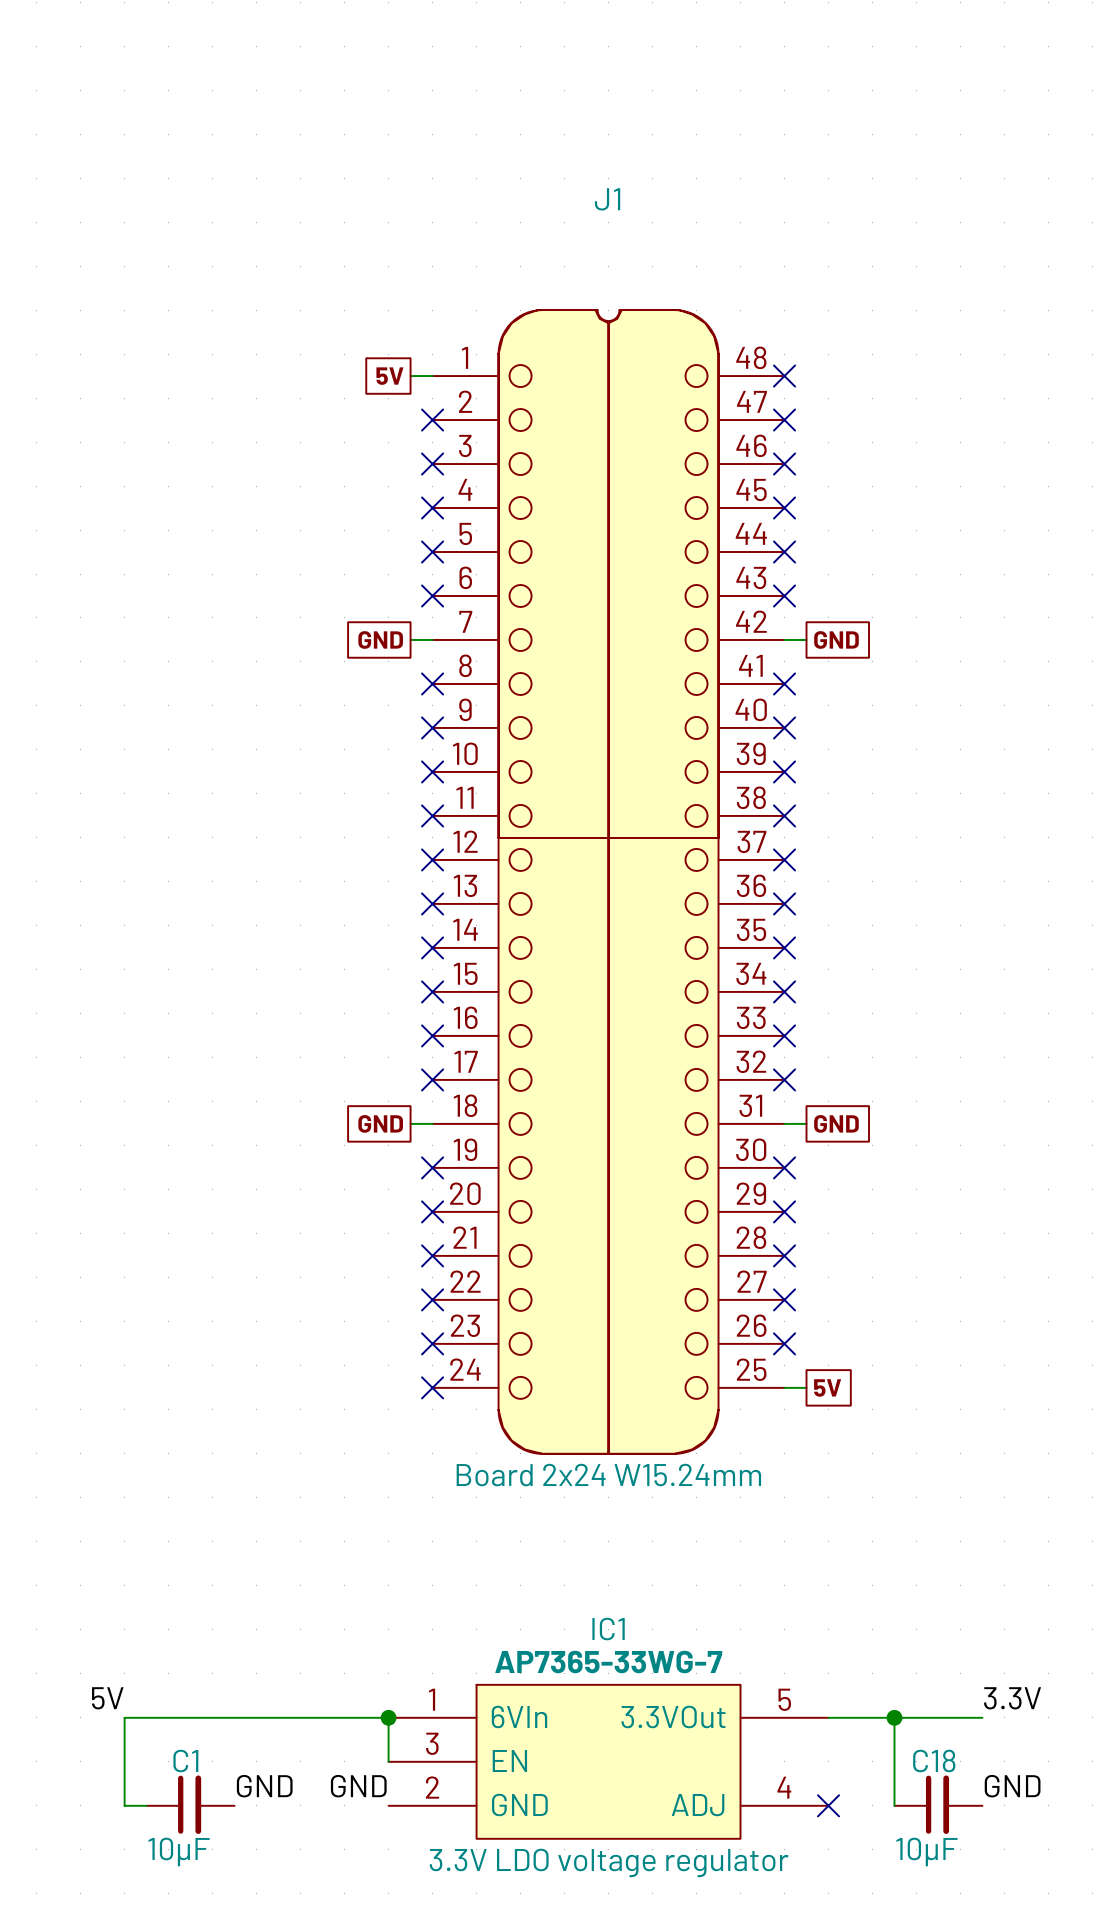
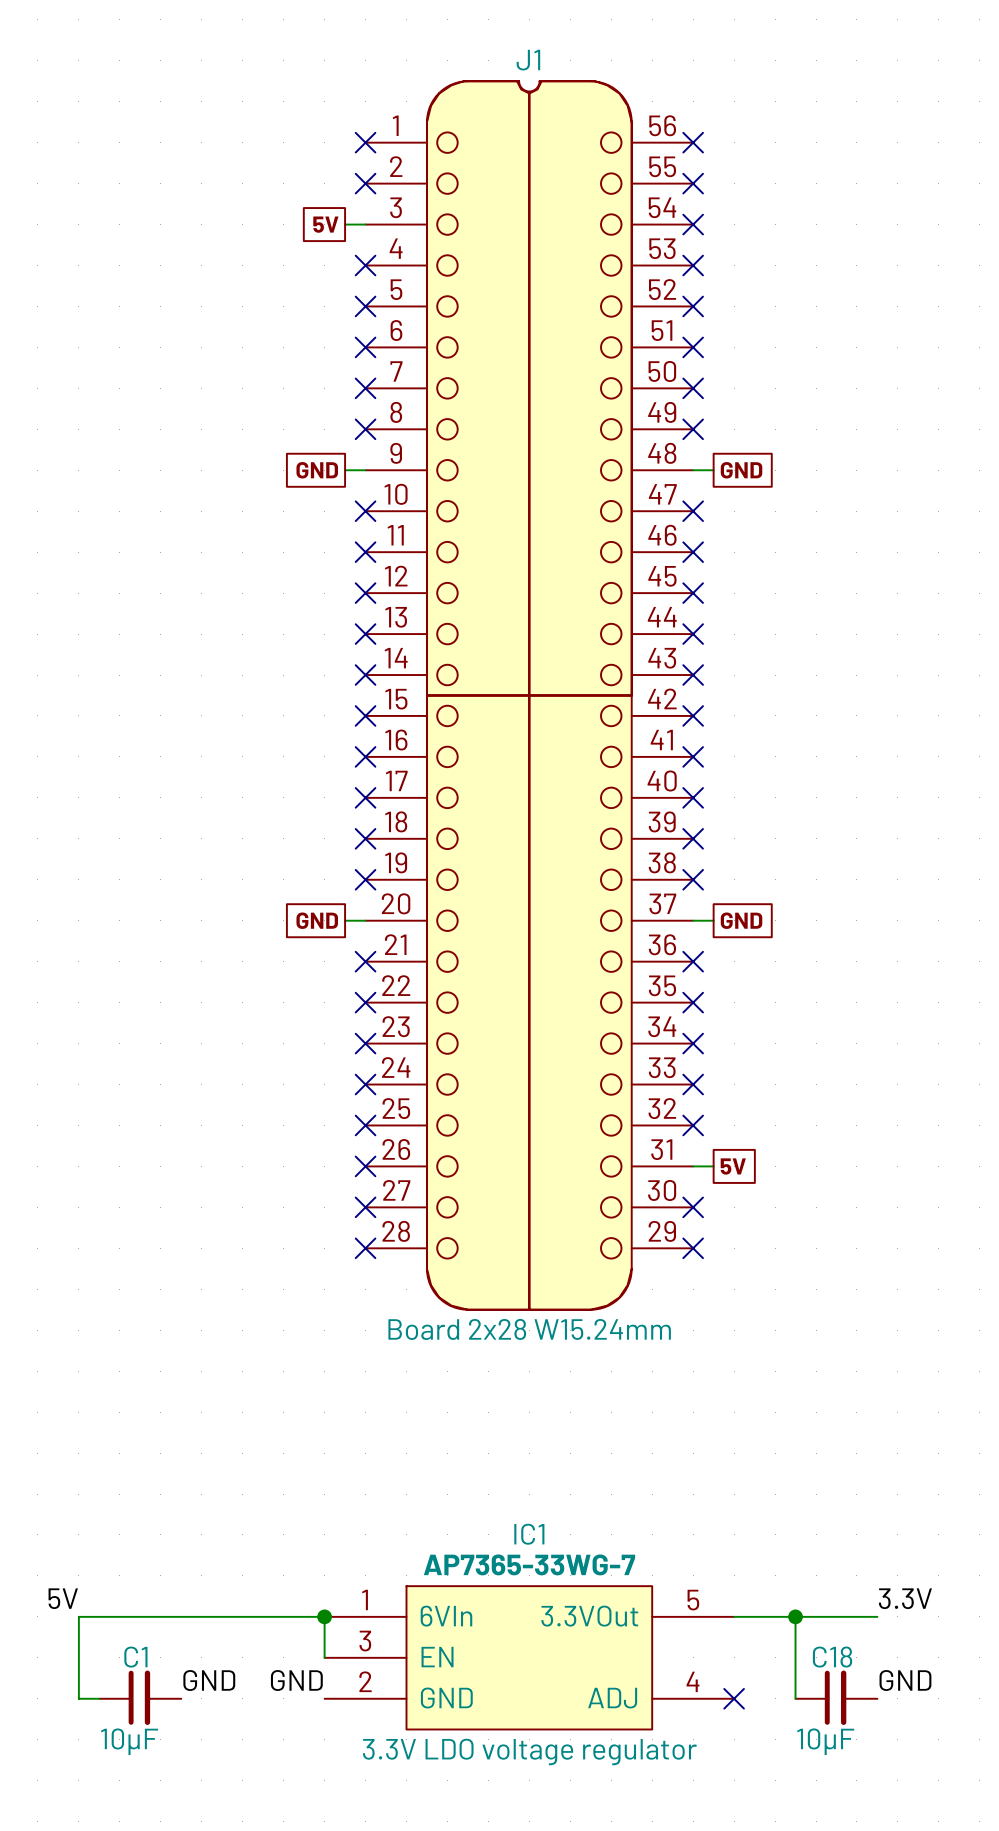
no-connect mark: none -> (365, 142)
no-connect mark: none -> (693, 142)
no-connect mark: none -> (365, 183)
no-connect mark: none -> (693, 183)
no-connect mark: none -> (693, 224)
no-connect mark: none -> (365, 265)
no-connect mark: none -> (693, 265)
no-connect mark: none -> (365, 306)
J1 symbol: [432, 310, 785, 1454] -> [365, 81, 694, 1310]
no-connect mark: none -> (693, 306)
no-connect mark: none -> (365, 347)
no-connect mark: none -> (693, 347)
global label position: 5V (389, 376) -> 5V (325, 224)
wire: (410, 376) (432, 376) -> (345, 224) (365, 224)
no-connect mark: (784, 376) -> none
no-connect mark: none -> (365, 388)
no-connect mark: none -> (693, 388)
no-connect mark: (432, 420) -> none
no-connect mark: (784, 420) -> none
no-connect mark: none -> (365, 429)
no-connect mark: none -> (693, 429)
no-connect mark: (432, 464) -> none
no-connect mark: (784, 464) -> none
no-connect mark: (432, 508) -> none
no-connect mark: (784, 508) -> none
no-connect mark: none -> (365, 511)
no-connect mark: none -> (693, 511)
no-connect mark: (432, 552) -> none
no-connect mark: (784, 552) -> none
no-connect mark: none -> (365, 552)
no-connect mark: none -> (693, 552)
no-connect mark: (432, 595) -> none
no-connect mark: (784, 595) -> none
no-connect mark: none -> (365, 593)
no-connect mark: none -> (693, 593)
global label position: GND (380, 639) -> GND (317, 470)
wire: (410, 639) (432, 639) -> (345, 470) (365, 470)
wire: (784, 639) (806, 639) -> (693, 470) (713, 470)
global label position: GND (836, 639) -> GND (741, 470)
no-connect mark: none -> (365, 634)
no-connect mark: none -> (693, 634)
no-connect mark: (432, 683) -> none
no-connect mark: (784, 683) -> none
no-connect mark: none -> (365, 675)
no-connect mark: none -> (693, 675)
no-connect mark: (432, 727) -> none
no-connect mark: (784, 727) -> none
no-connect mark: none -> (365, 715)
no-connect mark: none -> (693, 715)
no-connect mark: (432, 771) -> none
no-connect mark: (784, 771) -> none
no-connect mark: none -> (365, 756)
no-connect mark: none -> (693, 756)
no-connect mark: (432, 815) -> none
no-connect mark: (784, 815) -> none
no-connect mark: none -> (365, 797)
no-connect mark: none -> (693, 797)
no-connect mark: (432, 859) -> none
no-connect mark: (784, 859) -> none
no-connect mark: none -> (365, 838)
no-connect mark: none -> (693, 838)
no-connect mark: (432, 903) -> none
no-connect mark: (784, 903) -> none
no-connect mark: none -> (365, 879)
no-connect mark: none -> (693, 879)
no-connect mark: (432, 947) -> none
no-connect mark: (784, 947) -> none
no-connect mark: (432, 991) -> none
no-connect mark: (784, 991) -> none
no-connect mark: none -> (365, 961)
no-connect mark: none -> (693, 961)
no-connect mark: (432, 1035) -> none
no-connect mark: (784, 1035) -> none
no-connect mark: none -> (365, 1002)
no-connect mark: none -> (693, 1002)
no-connect mark: (432, 1079) -> none
no-connect mark: (784, 1079) -> none
no-connect mark: none -> (365, 1043)
no-connect mark: none -> (693, 1043)
global label position: GND (380, 1123) -> GND (317, 920)
wire: (410, 1123) (432, 1123) -> (345, 920) (365, 920)
wire: (784, 1123) (806, 1123) -> (693, 920) (713, 920)
global label position: GND (836, 1123) -> GND (741, 920)
no-connect mark: none -> (365, 1084)
no-connect mark: none -> (693, 1084)
no-connect mark: (432, 1167) -> none
no-connect mark: (784, 1167) -> none
no-connect mark: none -> (365, 1125)
no-connect mark: none -> (693, 1125)
no-connect mark: (432, 1211) -> none
no-connect mark: (784, 1211) -> none
no-connect mark: none -> (365, 1166)
no-connect mark: (432, 1255) -> none
no-connect mark: (784, 1255) -> none
no-connect mark: none -> (365, 1207)
no-connect mark: none -> (693, 1207)
no-connect mark: (432, 1299) -> none
no-connect mark: (784, 1299) -> none
no-connect mark: none -> (365, 1248)
no-connect mark: none -> (693, 1248)
no-connect mark: (432, 1343) -> none
no-connect mark: (784, 1343) -> none
no-connect mark: (432, 1387) -> none
wire: (784, 1387) (806, 1387) -> (693, 1166) (713, 1166)
global label position: 5V (827, 1387) -> 5V (733, 1166)
J1 value: Board 2x24 W15.24mm (608, 1475) -> Board 2x28 W15.24mm (529, 1329)

